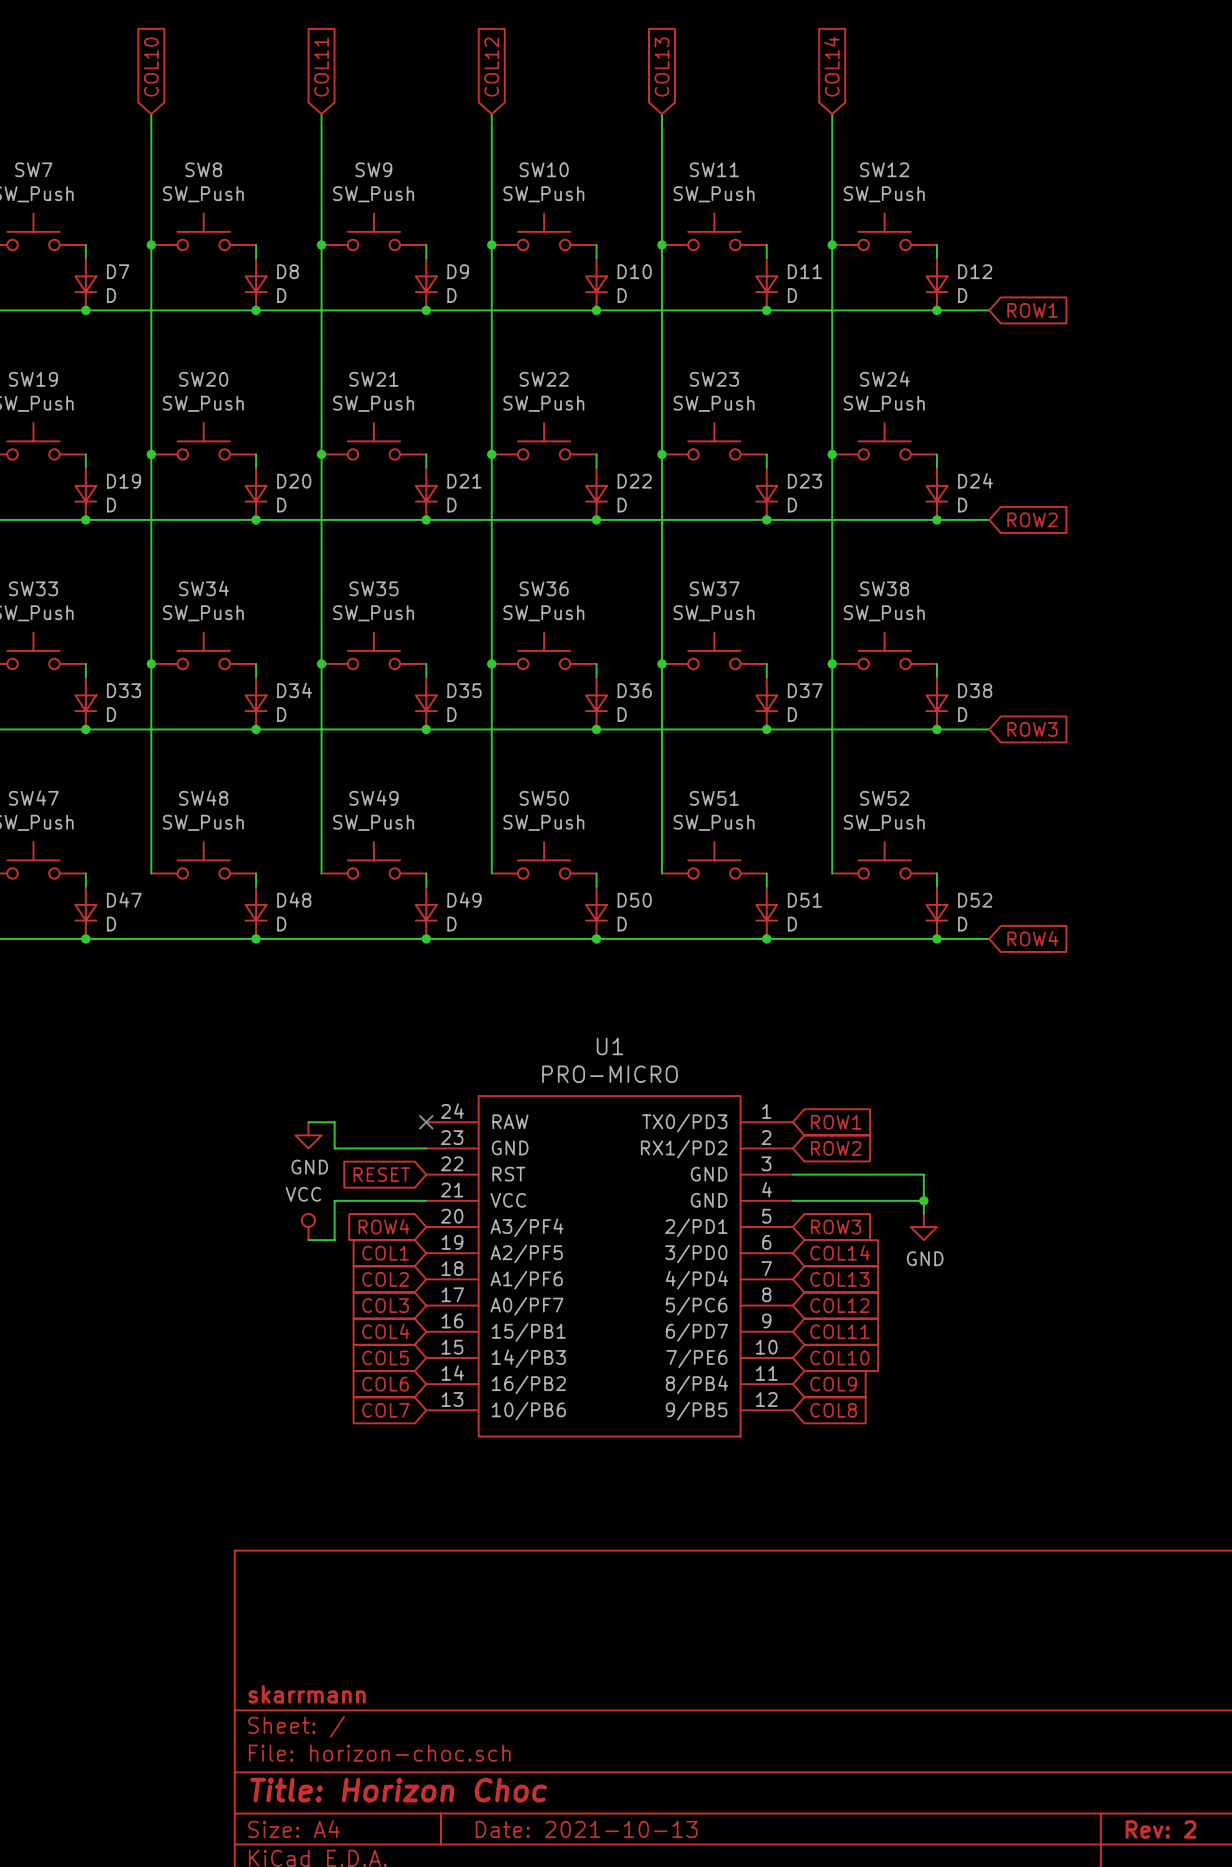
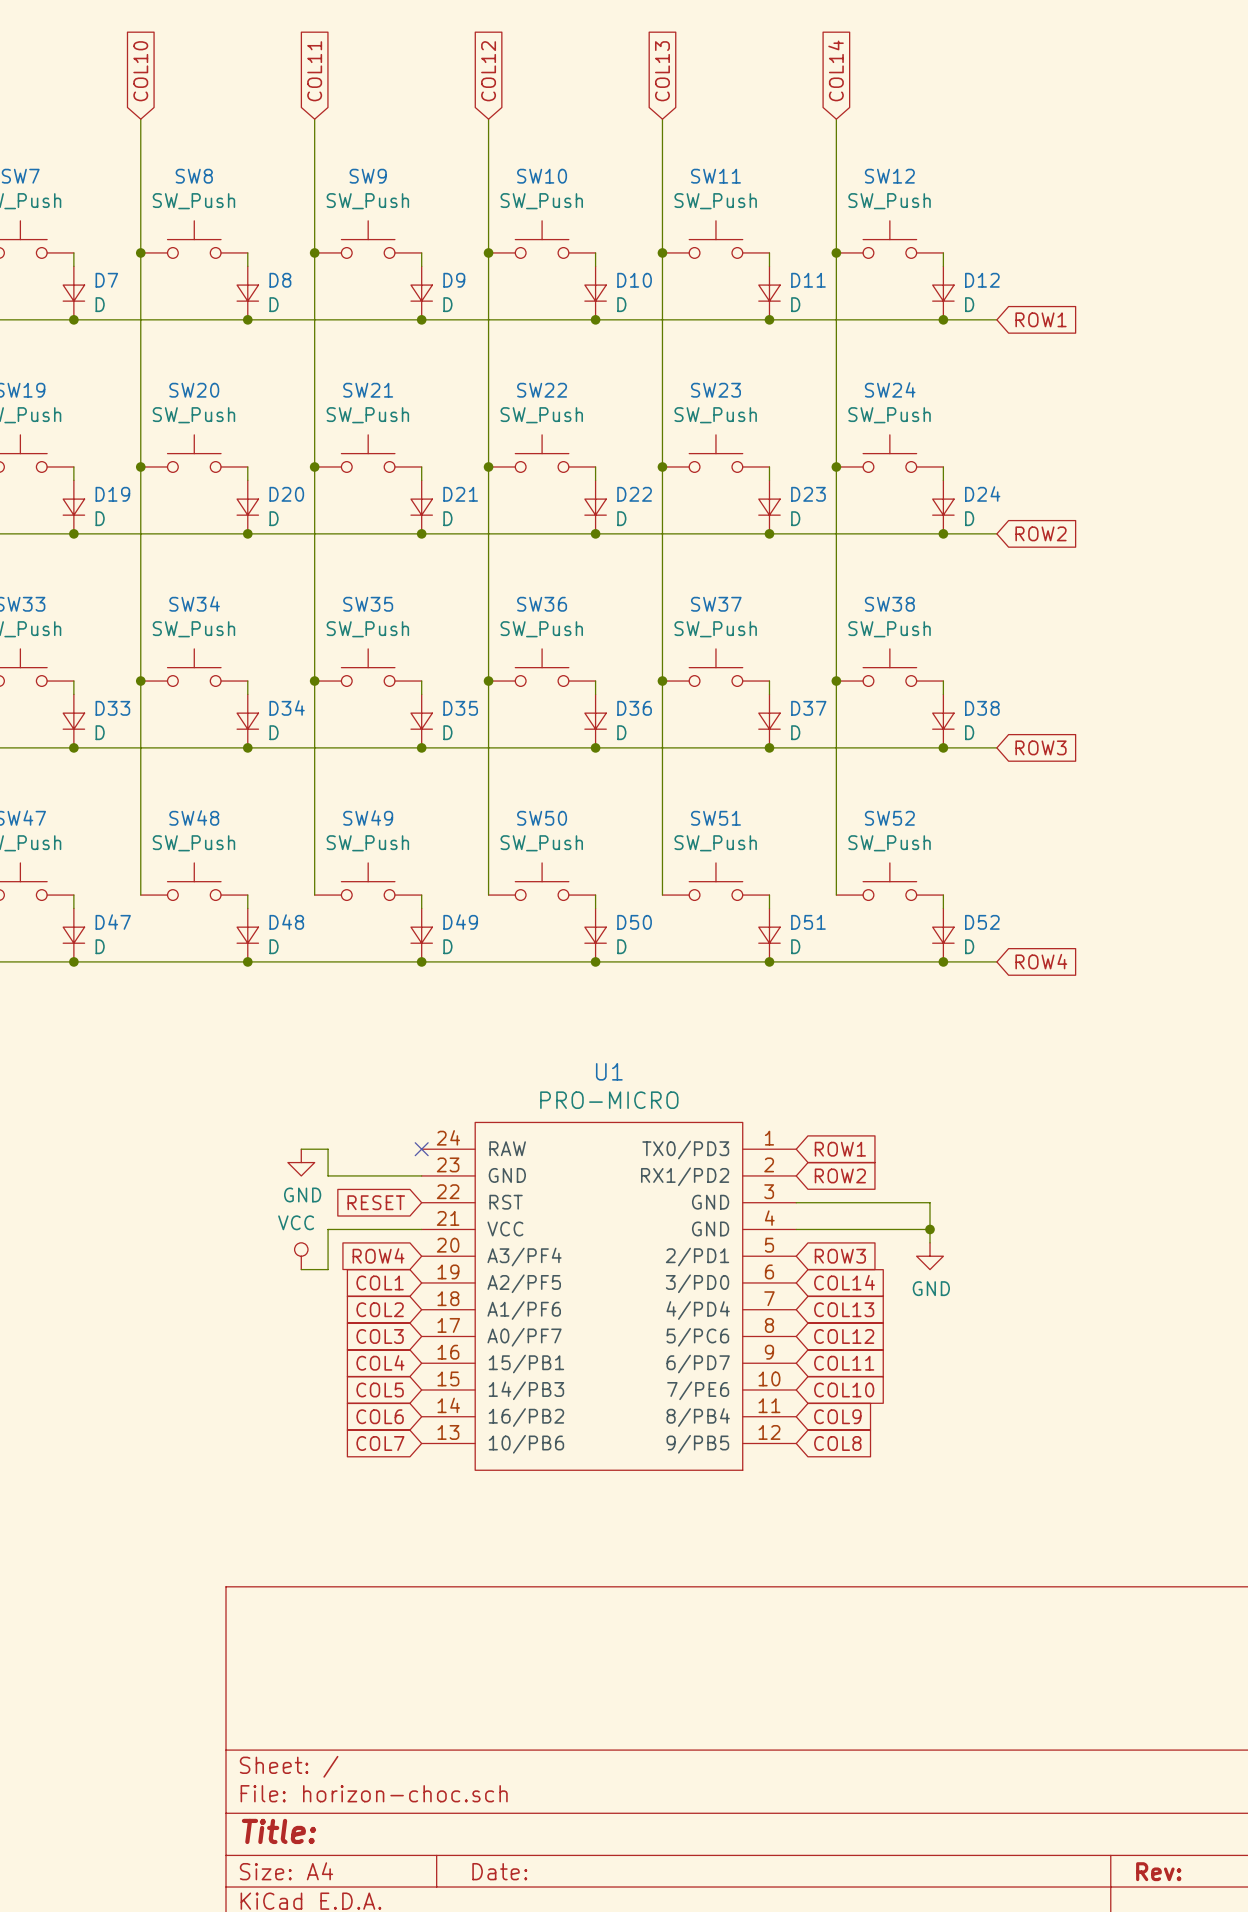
title block: skarrmann (307, 1694) -> none
title block: Title: Horizon Choc (398, 1790) -> Title: (278, 1831)
title block: Date: 2021-10-13 (586, 1829) -> Date: (499, 1871)
title block: Rev: 2 (1161, 1829) -> Rev: (1158, 1871)

